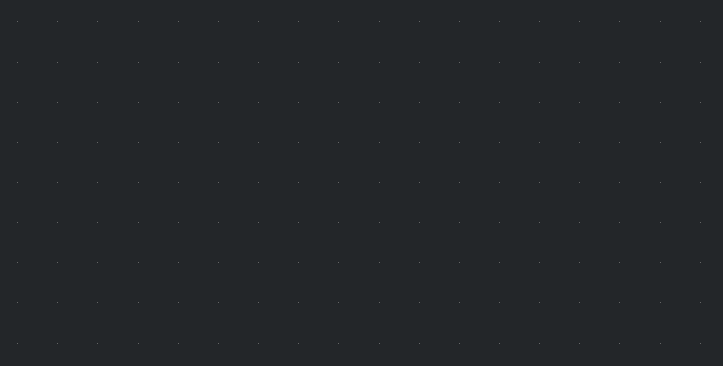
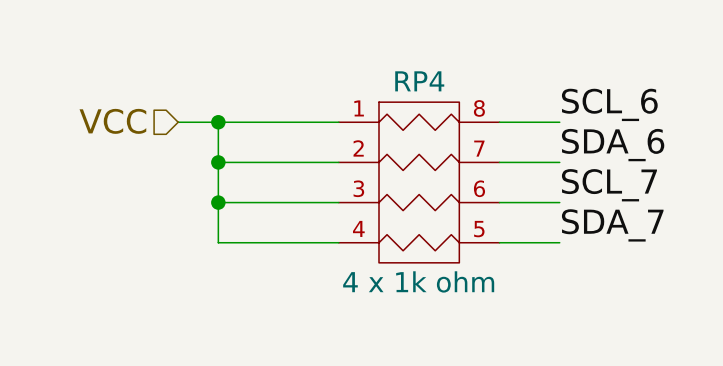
label: none -> SCL_6 (609, 104)
hierarchical label: none -> VCC (112, 121)
wire: none -> (178, 122) (338, 122)
wire: none -> (218, 122) (218, 242) (338, 242)
junction: none -> (218, 122)
wire: none -> (499, 122) (559, 122)
label: none -> SDA_6 (613, 145)
wire: none -> (218, 162) (338, 162)
junction: none -> (218, 162)
wire: none -> (499, 162) (559, 162)
RP4: none -> 4 x 1k ohm (419, 182)
label: none -> SCL_7 (609, 185)
wire: none -> (218, 202) (338, 202)
junction: none -> (218, 202)
wire: none -> (499, 202) (559, 202)
label: none -> SDA_7 (612, 225)
wire: none -> (499, 242) (559, 242)

